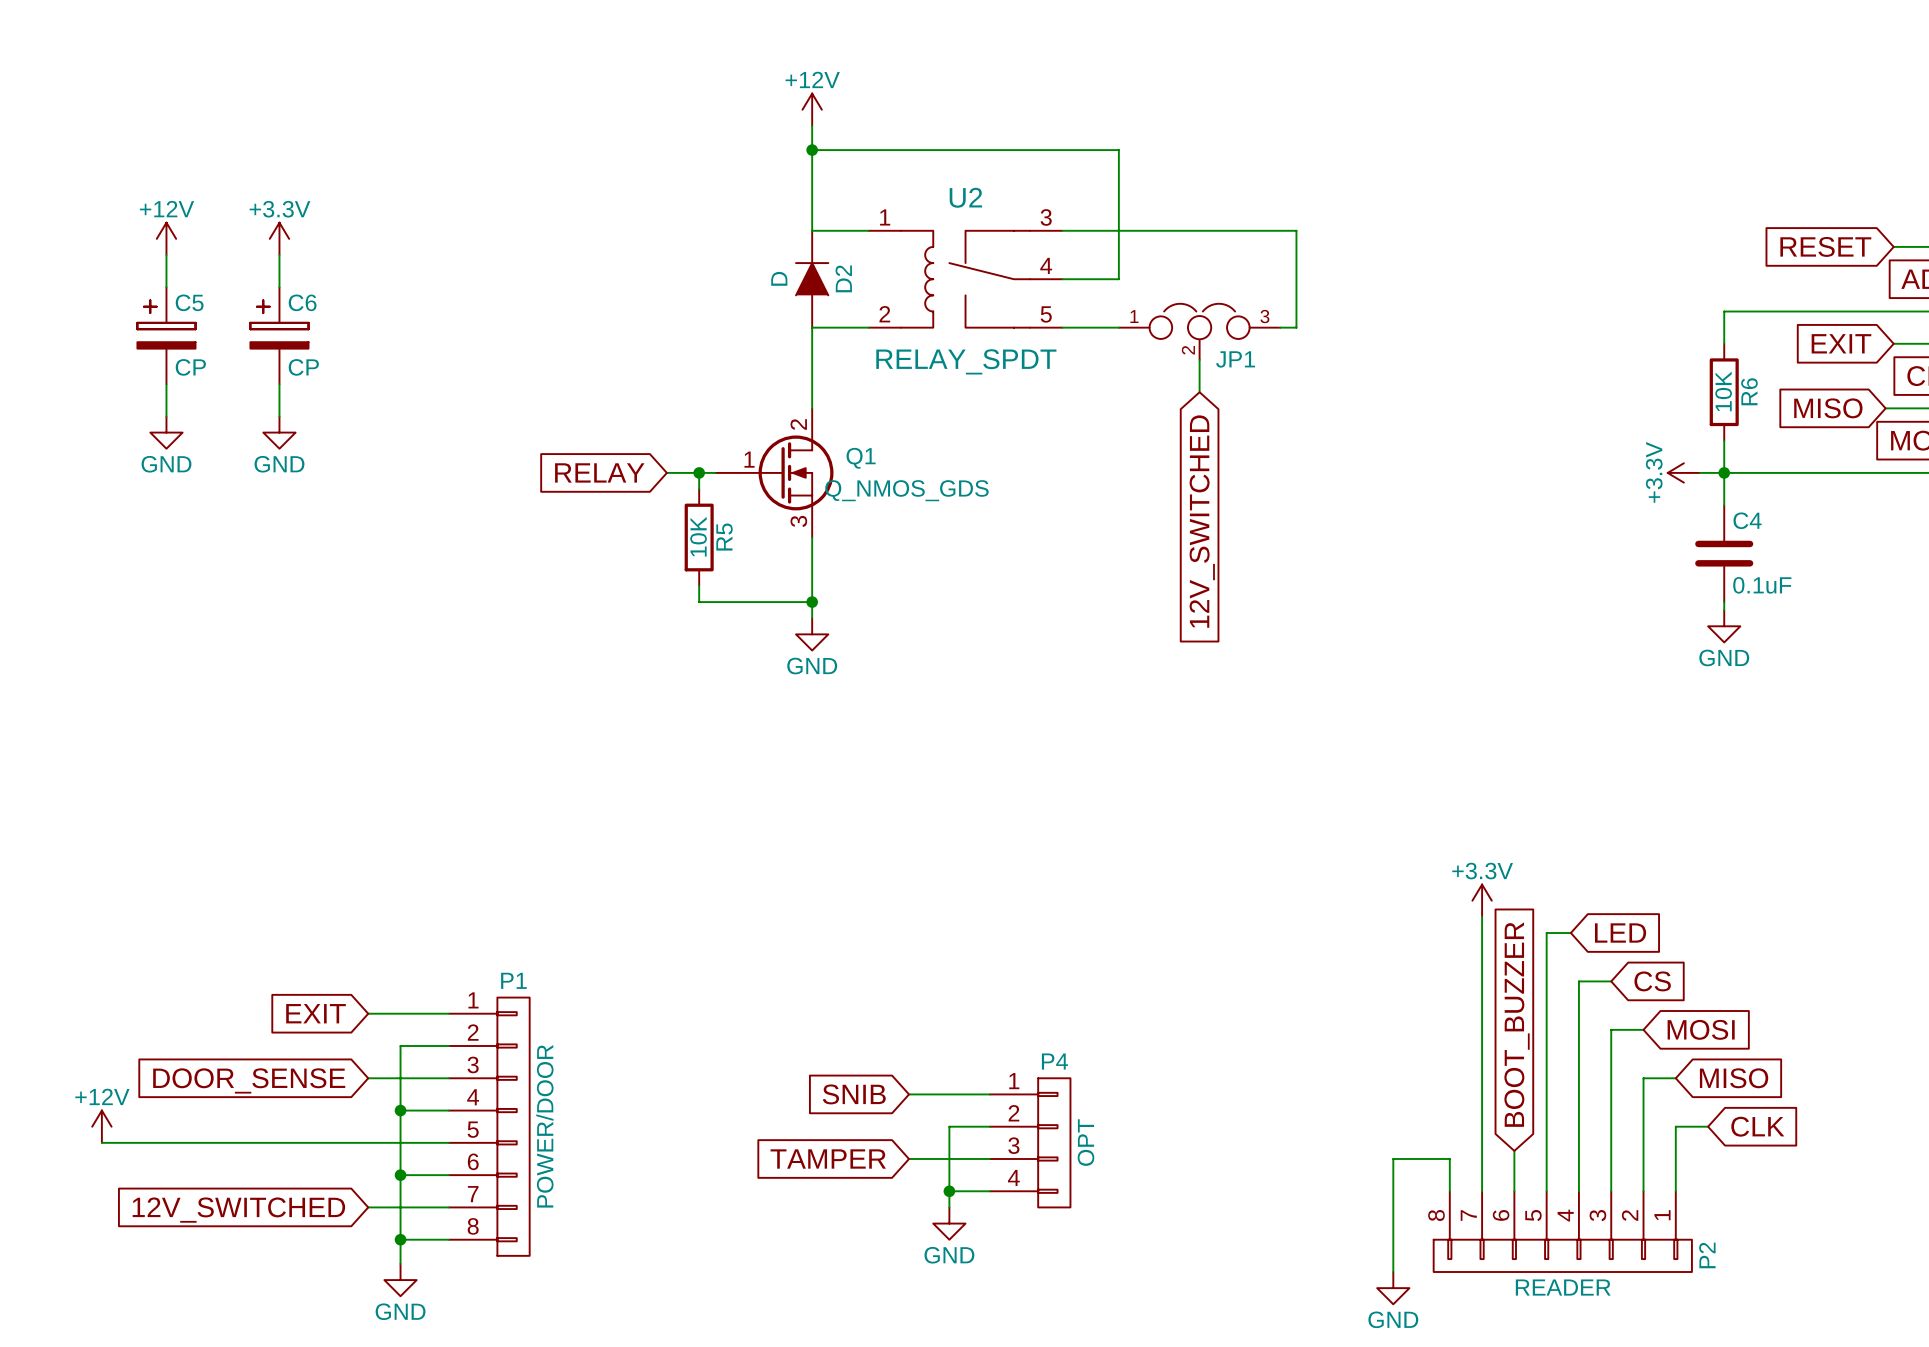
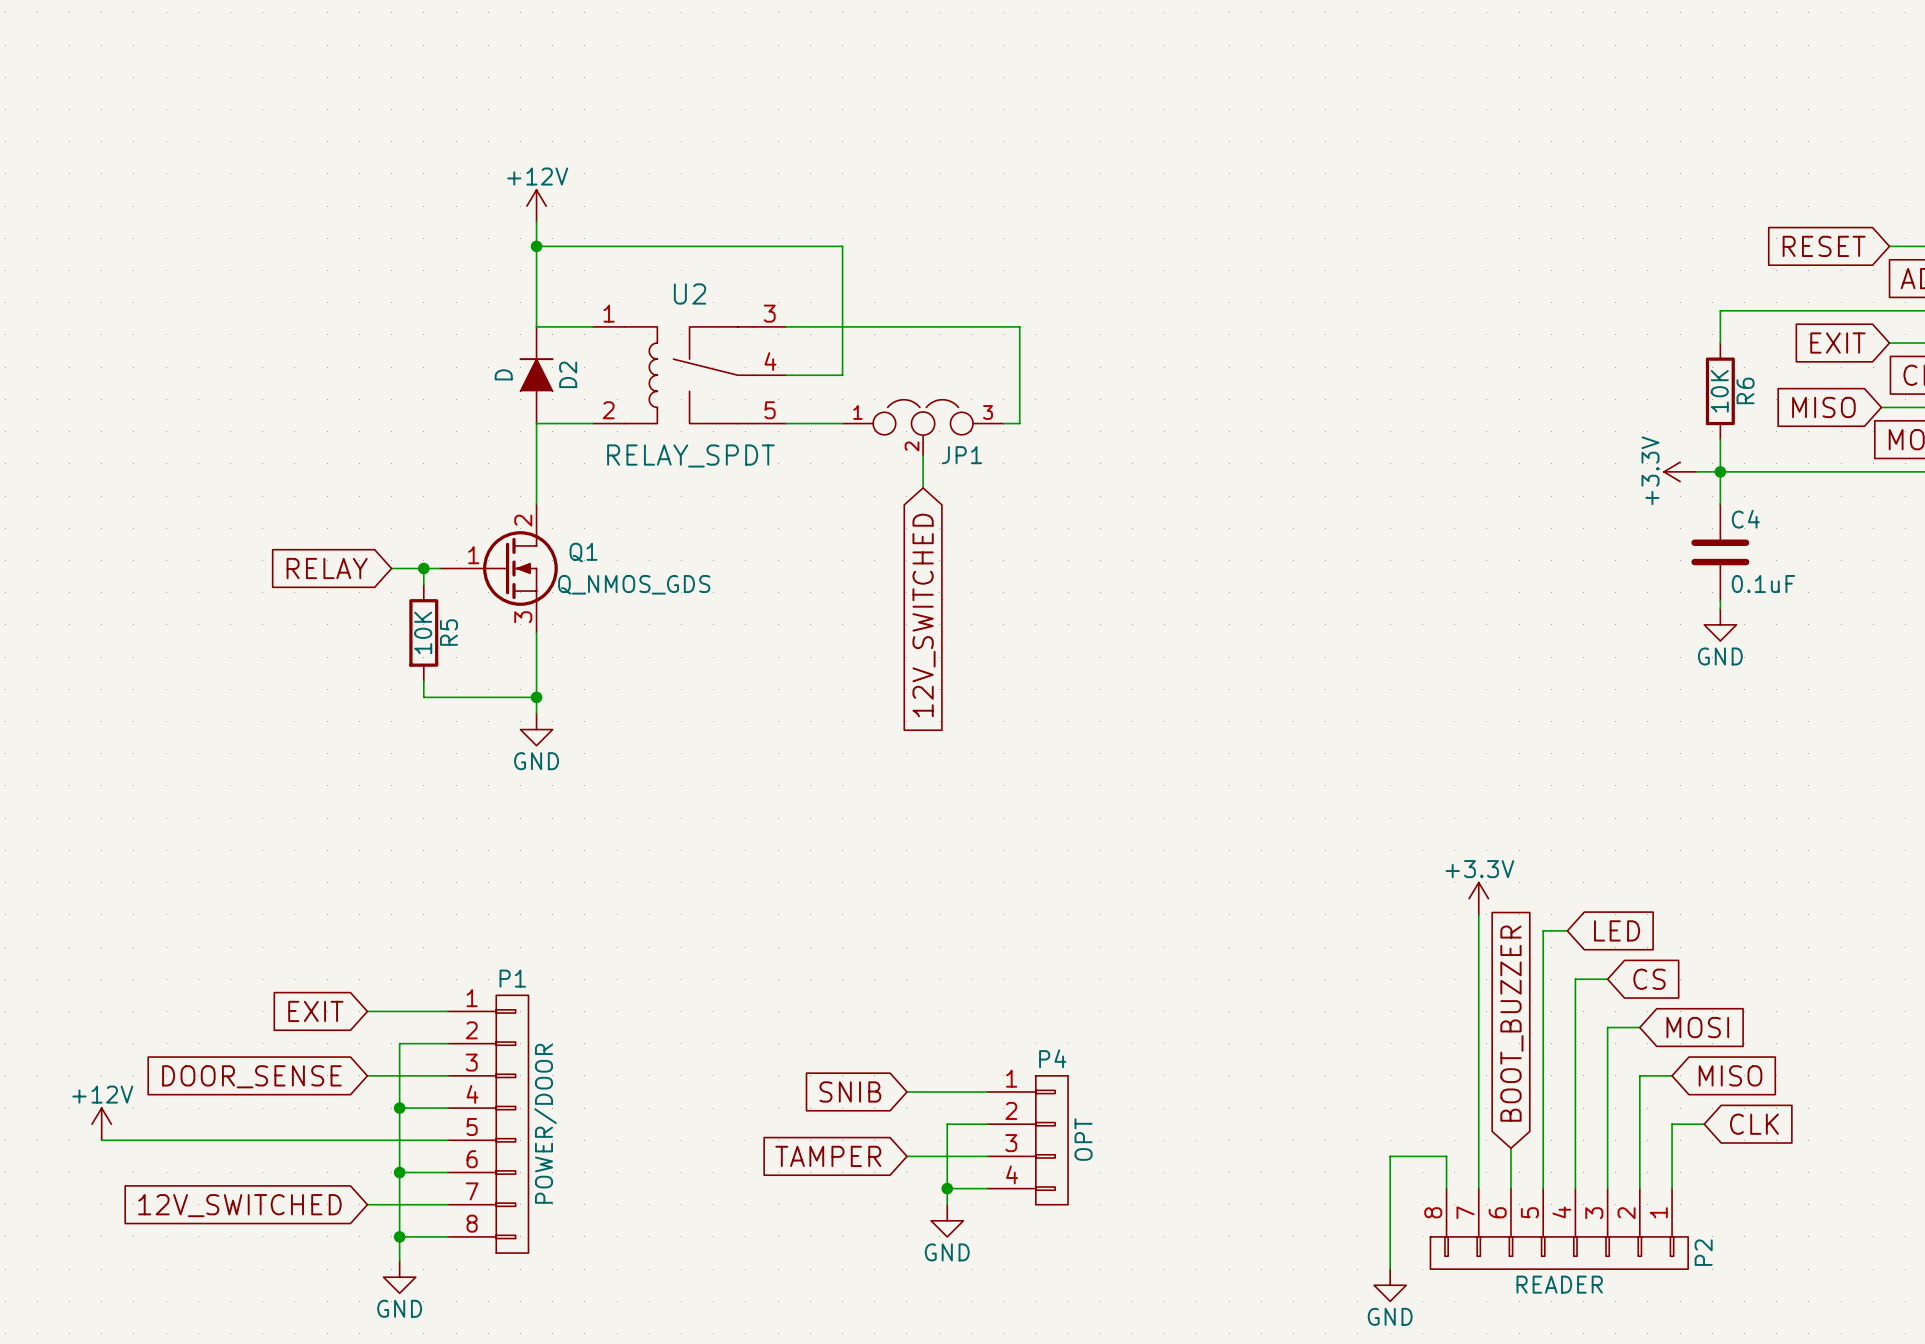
power symbol: +12V (812, 109) -> none
wire: (812, 125) (812, 230) (868, 230) -> (536, 222) (536, 326) (592, 326)
wire: (812, 150) (1118, 150) (1118, 279) (1062, 279) -> (536, 246) (842, 246) (842, 375) (786, 375)
junction: (812, 150) -> none
power symbol: none -> +12V (536, 206)
wire: (1062, 230) (1296, 230) (1296, 327) (1280, 327) -> none
power symbol: +12V (166, 238) -> none
power symbol: +3.3V (279, 238) -> none
junction: none -> (536, 246)
wire: (166, 255) (166, 287) -> none
wire: (279, 255) (279, 287) -> none
D2 position: (812, 279) -> (536, 375)
U2 position: (965, 279) -> (689, 375)
wire: (812, 327) (812, 408) -> (810, 326) (786, 326)
wire: none -> (866, 326) (1019, 326) (1019, 423) (1003, 423)
wire: (1062, 327) (1118, 327) -> (786, 423) (842, 423)
JP1 position: (1199, 331) -> (923, 427)
C5: CP (166, 335) -> none
C6: CP (279, 335) -> none
wire: (1199, 359) (1199, 392) -> (923, 455) (923, 487)
wire: (166, 384) (166, 416) -> none
wire: (279, 384) (279, 416) -> none
wire: none -> (592, 423) (536, 423) (536, 504)
power symbol: GND (166, 432) -> none
power symbol: GND (279, 432) -> none
global label position: RELAY (599, 472) -> RELAY (327, 568)
wire: (666, 472) (715, 472) -> (391, 568) (439, 568)
wire: (699, 472) (699, 489) -> (423, 568) (423, 584)
junction: (699, 472) -> none
Q1 position: (774, 472) -> (498, 568)
global label position: 12V_SWITCHED (1202, 521) -> 12V_SWITCHED (924, 615)
R5 position: (699, 537) -> (423, 632)
wire: (812, 537) (812, 618) -> (536, 632) (536, 713)
junction: none -> (423, 568)
wire: (699, 585) (699, 602) (812, 602) -> (423, 681) (423, 697) (536, 697)
junction: (812, 602) -> none
power symbol: GND (812, 634) -> none
junction: none -> (536, 697)
power symbol: none -> GND (536, 729)

